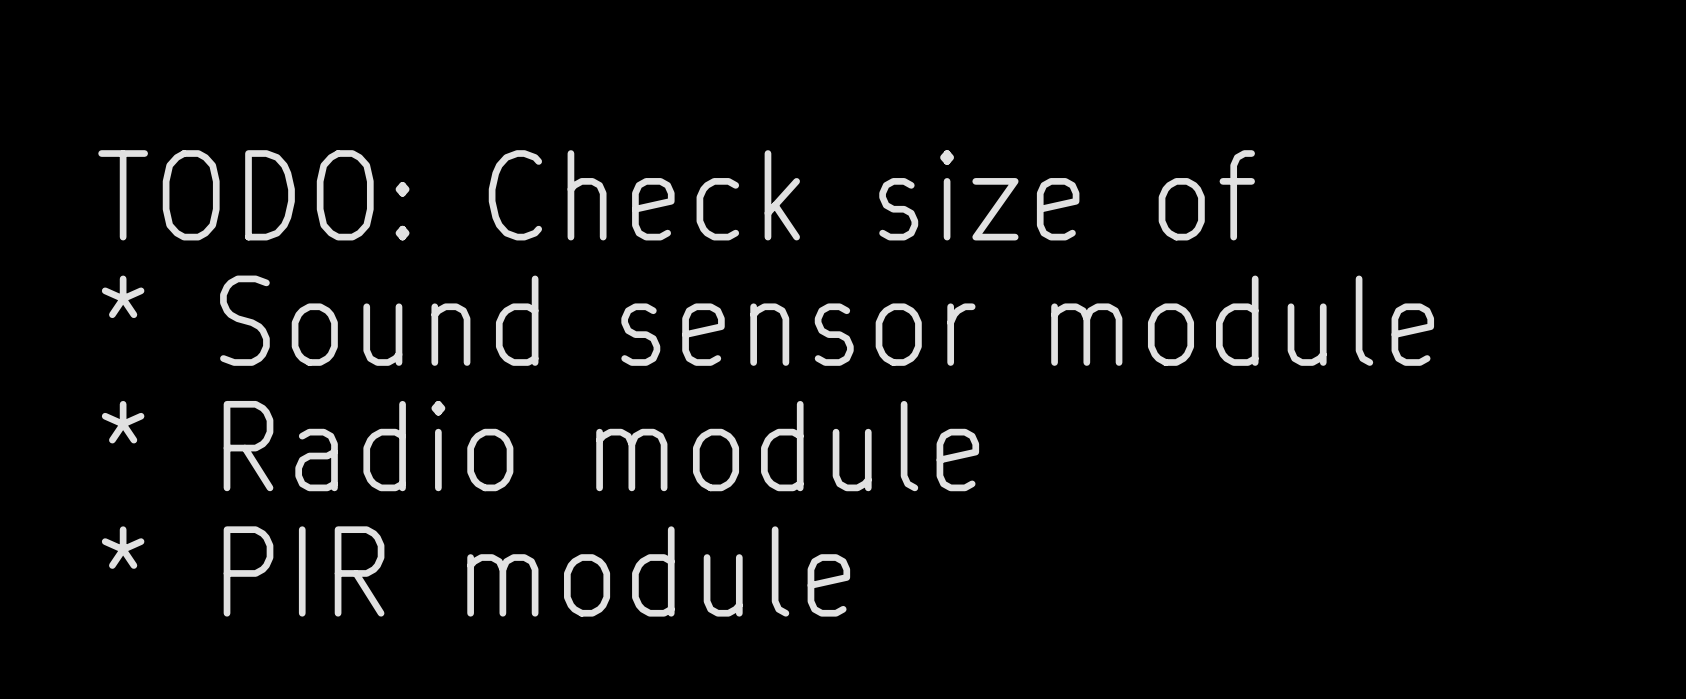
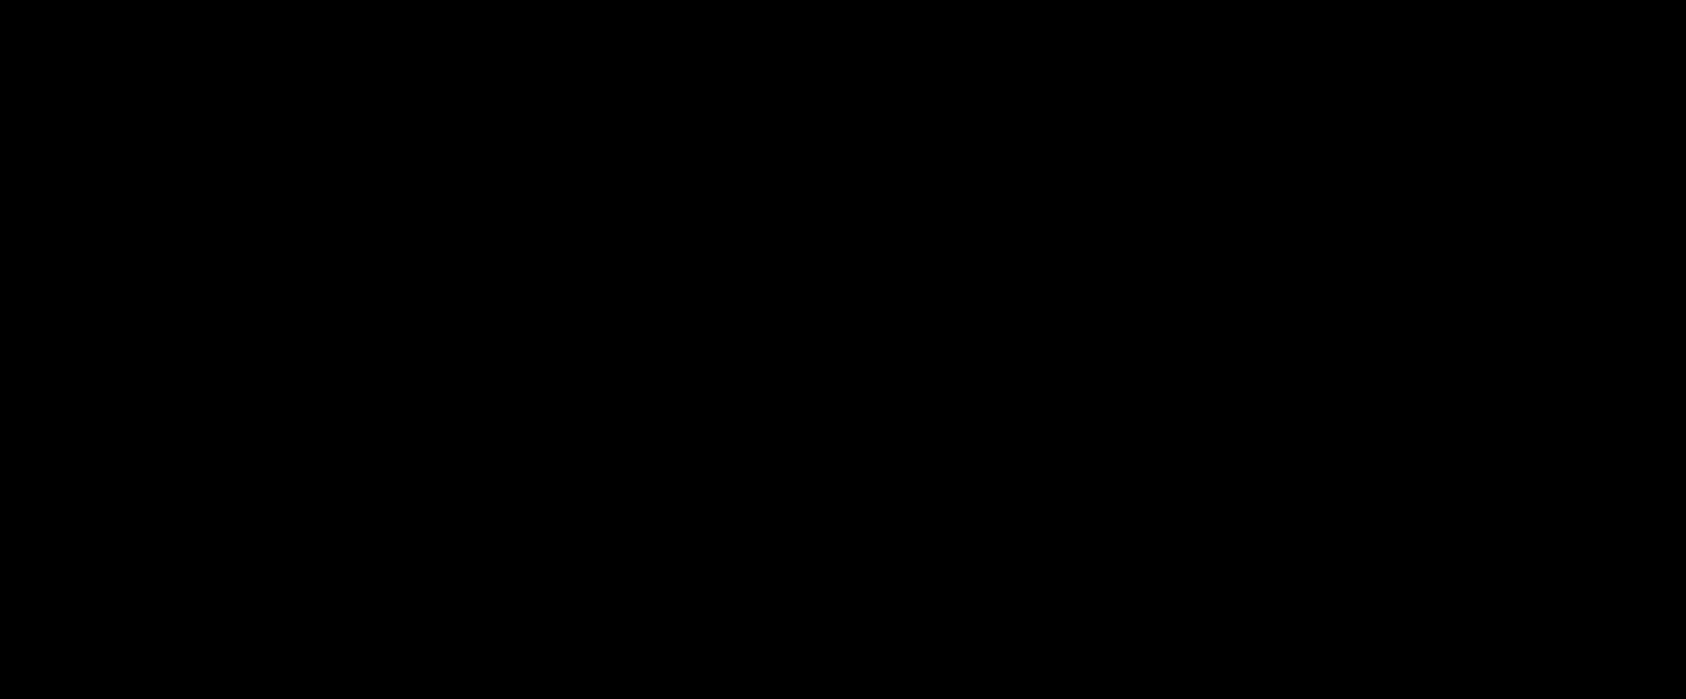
text: TODO: Check size of (676, 195) -> none
text: * Sound sensor module (767, 320) -> none
text: * Radio module (540, 446) -> none
text: * PIR module (476, 571) -> none

